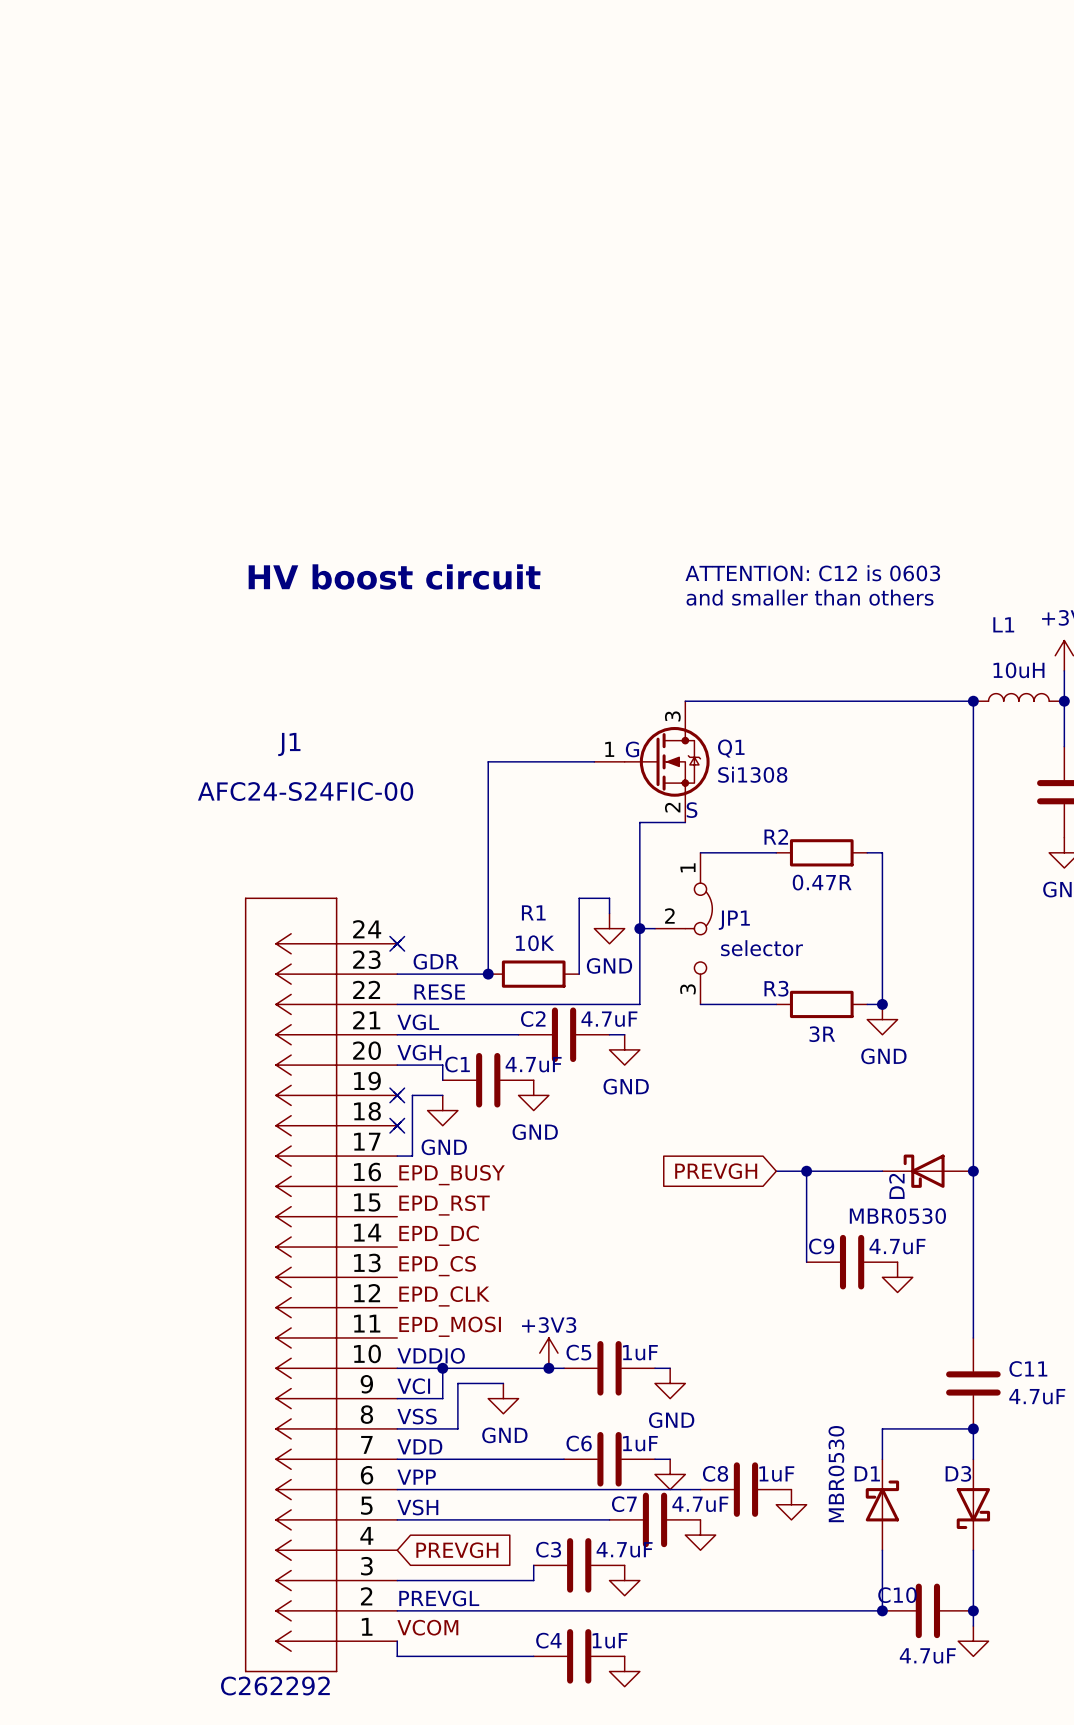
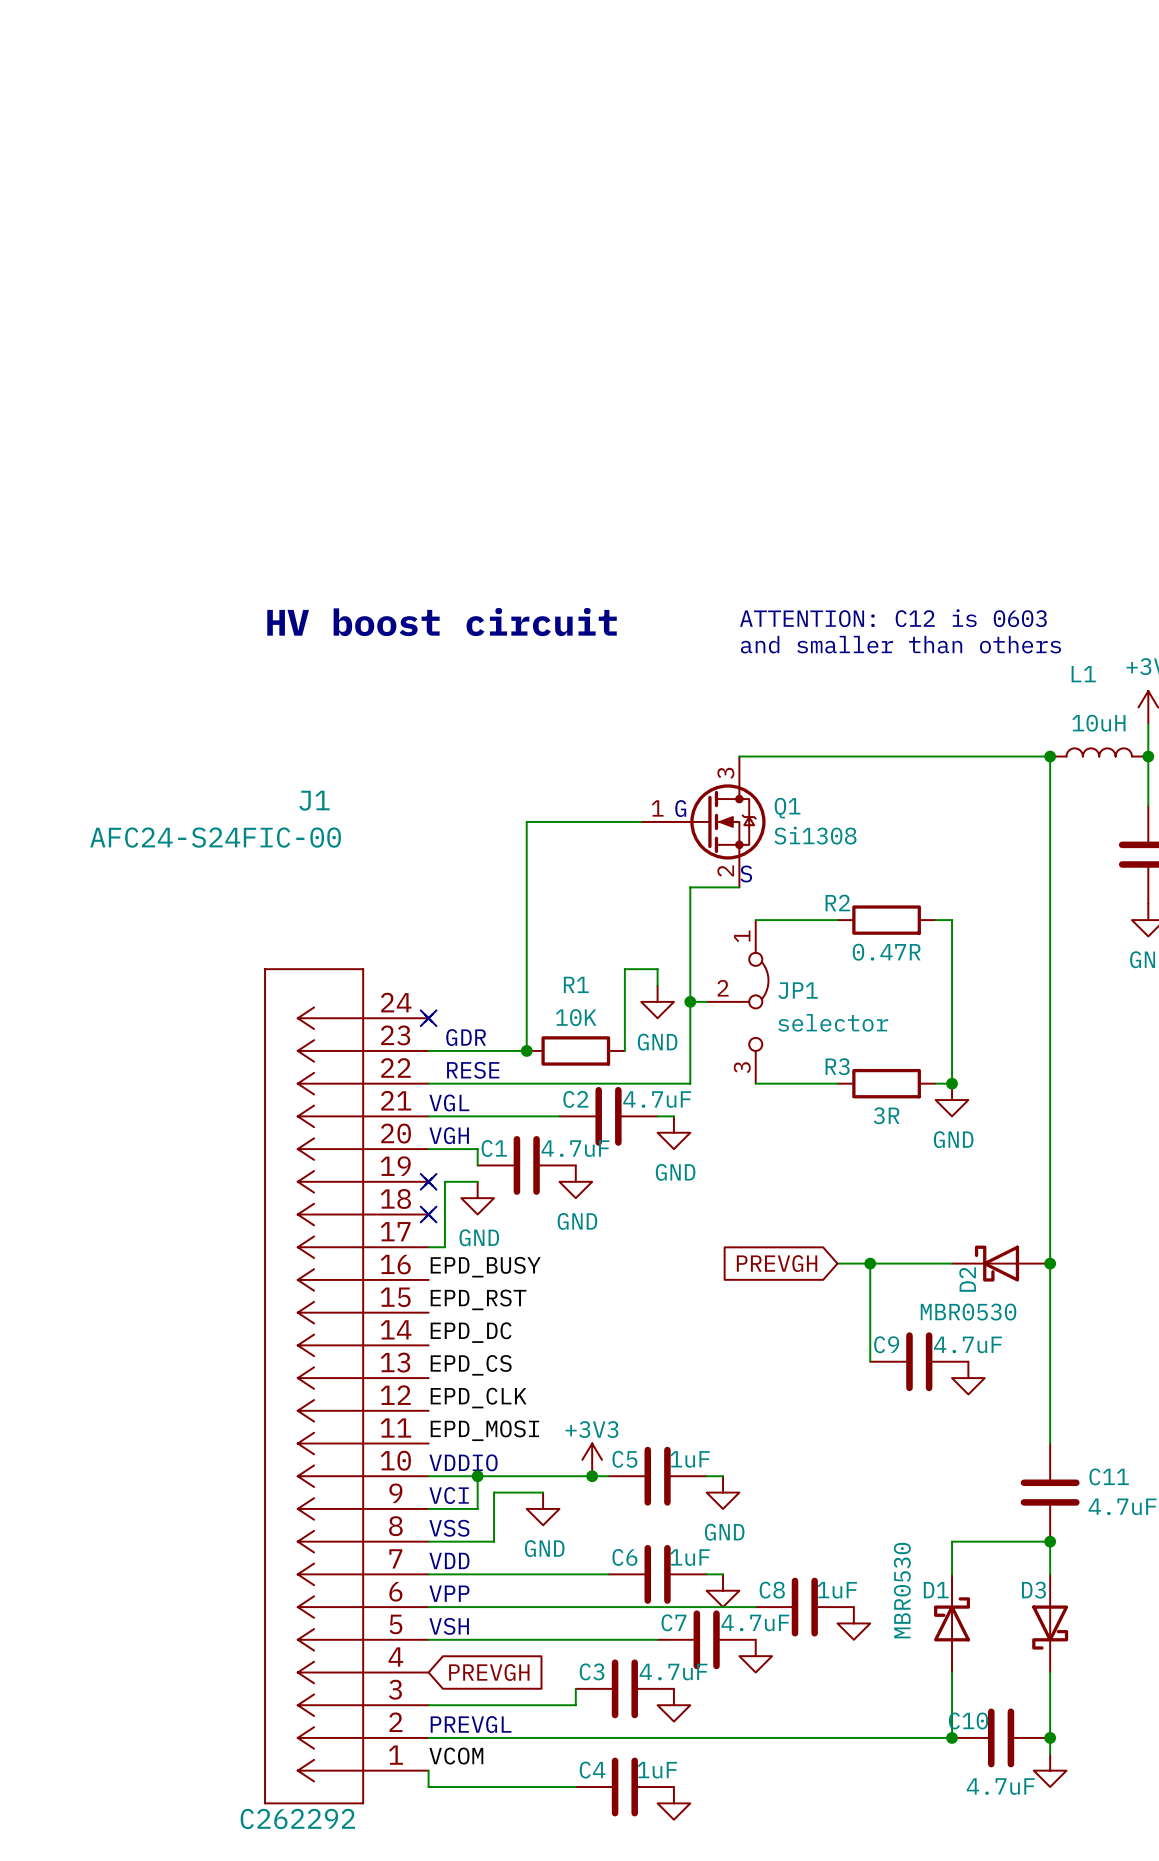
J1 value position: AFC24-S24FIC-00 (305, 791) -> AFC24-S24FIC-00 (215, 837)

